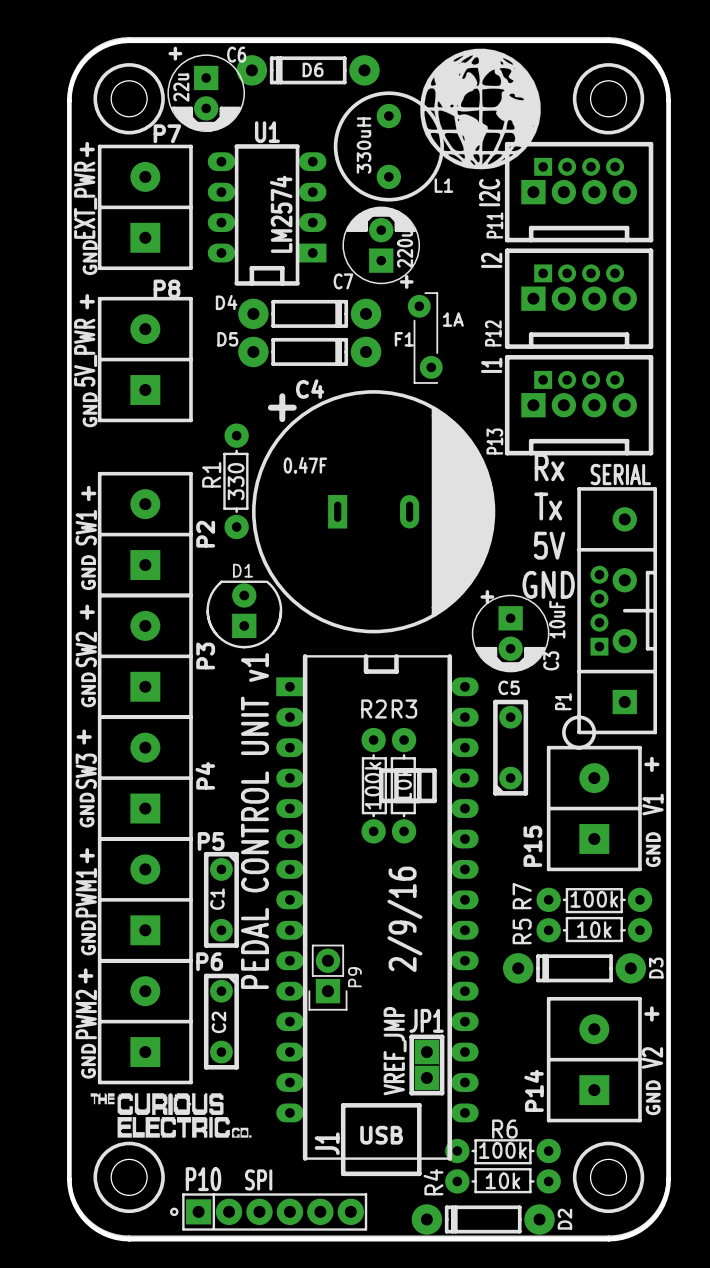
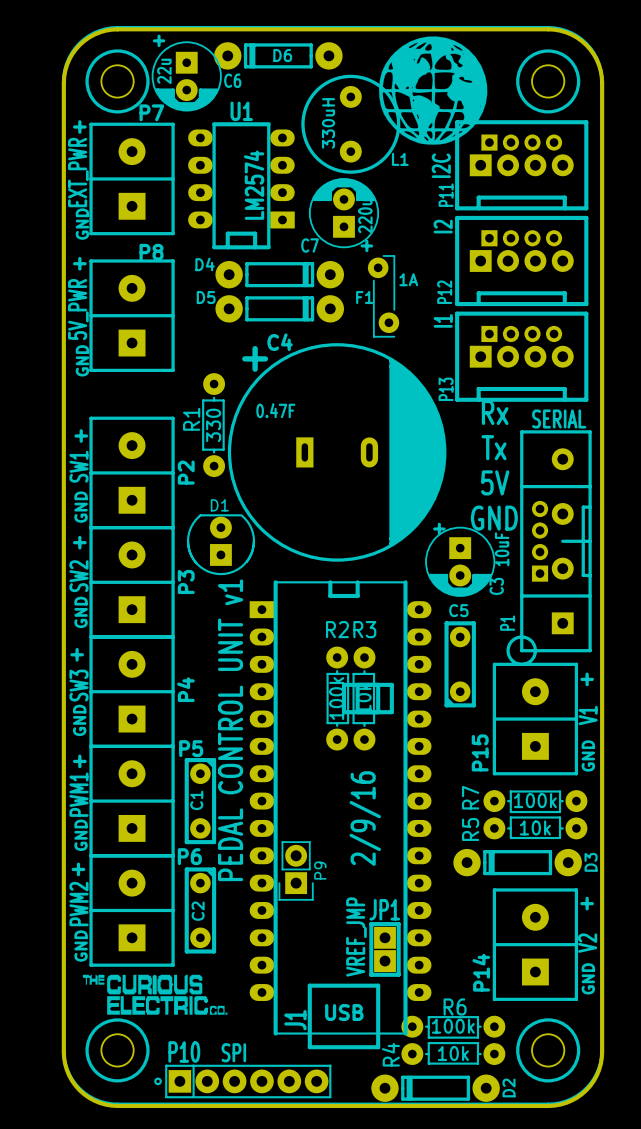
C6 name position: C6 (236, 54) -> C6 (232, 80)

